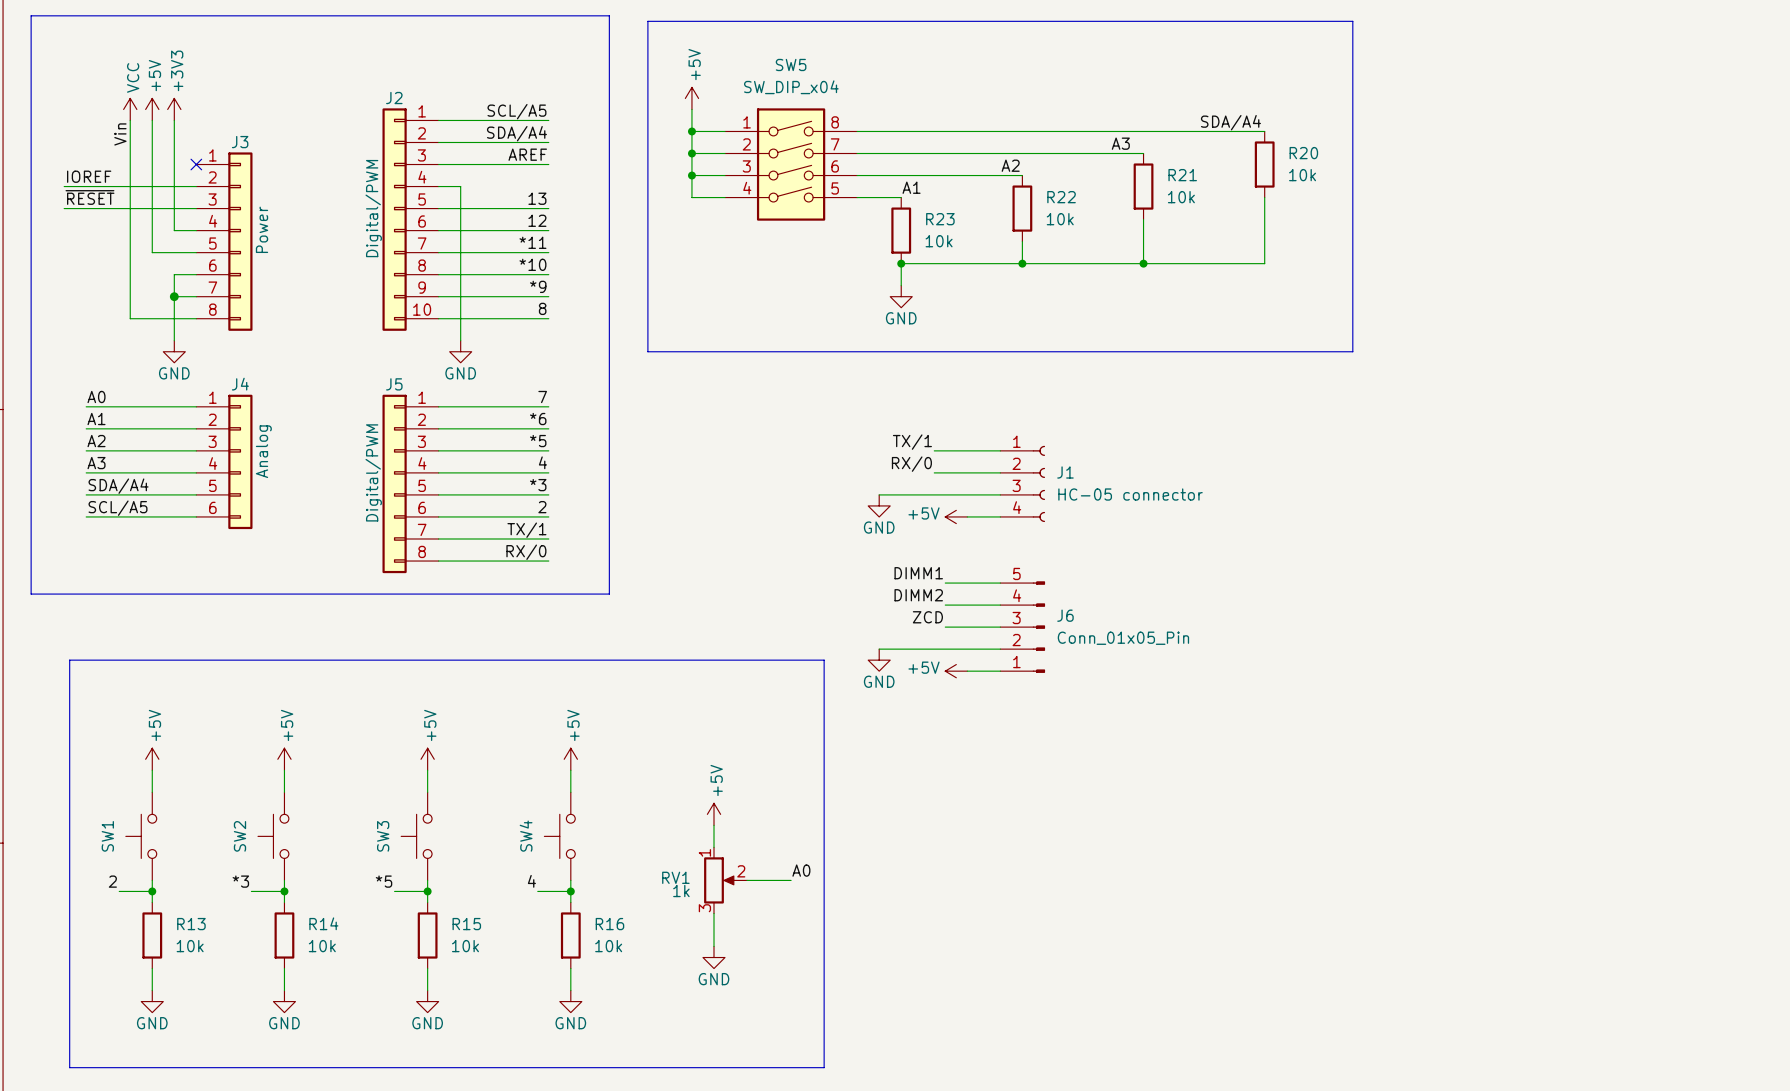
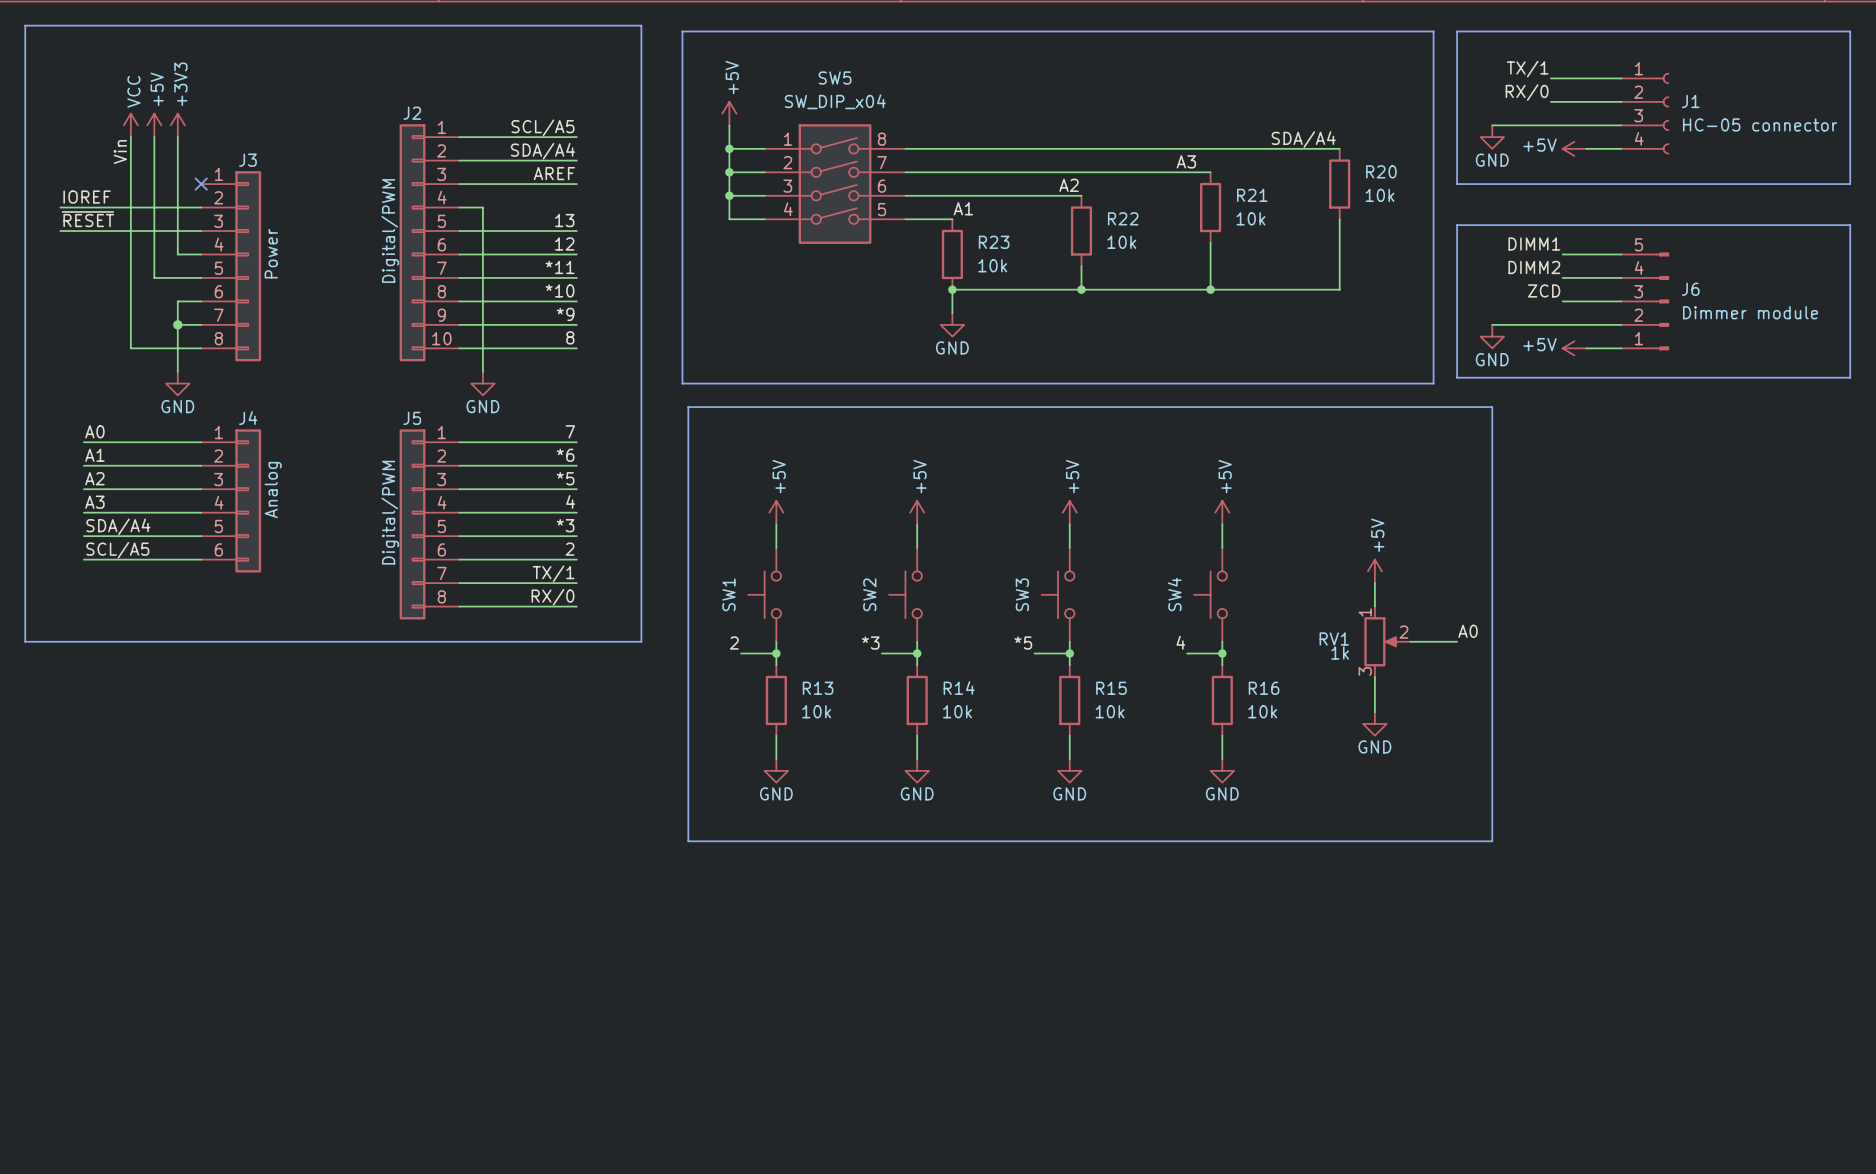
line: none -> (1457, 31) (1457, 184) (1850, 184) (1850, 31) (1457, 31)
label: none -> TX/1 (1527, 69)
wire: none -> (1550, 78) (1621, 78)
label: none -> RX/0 (1527, 92)
wire: none -> (1550, 101) (1621, 101)
wire: none -> (1492, 125) (1621, 125)
power symbol: none -> GND (1492, 137)
power symbol: none -> +5V (1574, 148)
wire: none -> (1586, 148) (1621, 148)
line: none -> (1457, 225) (1850, 225) (1850, 377) (1457, 377) (1457, 225)
label: none -> DIMM1 (1534, 244)
wire: none -> (1562, 254) (1621, 254)
label: none -> DIMM2 (1534, 267)
wire: none -> (1562, 277) (1621, 277)
label: none -> ZCD (1544, 290)
wire: none -> (1562, 301) (1621, 301)
wire: none -> (1492, 324) (1621, 324)
power symbol: none -> GND (1492, 336)
power symbol: none -> +5V (1574, 348)
wire: none -> (1586, 348) (1621, 348)
line: none -> (688, 407) (1492, 407) (1492, 841) (688, 841) (688, 407)
label: TX/1 (912, 442) -> none
wire: (934, 450) (1000, 450) -> none
label: RX/0 (911, 464) -> none
power symbol: none -> +5V (776, 512)
power symbol: none -> +5V (917, 512)
wire: (934, 472) (1000, 472) -> none
power symbol: none -> +5V (1069, 512)
power symbol: none -> +5V (1222, 512)
wire: none -> (776, 524) (776, 547)
wire: none -> (917, 524) (917, 547)
wire: none -> (1069, 524) (1069, 547)
J1 position: (1022, 483) -> (1645, 113)
wire: none -> (1222, 524) (1222, 547)
wire: (879, 494) (1000, 494) -> none
power symbol: GND (879, 505) -> none
power symbol: +5V (956, 516) -> none
wire: (967, 516) (1000, 516) -> none
power symbol: none -> +5V (1374, 571)
wire: none -> (1374, 583) (1374, 606)
label: DIMM1 (918, 573) -> none
wire: (945, 583) (1000, 583) -> none
label: none -> A0 (1468, 631)
wire: none -> (776, 641) (776, 665)
wire: none -> (917, 641) (917, 665)
wire: none -> (1069, 641) (1069, 665)
label: none -> 4 (1180, 642)
wire: none -> (1222, 641) (1222, 665)
wire: none -> (1410, 641) (1457, 641)
label: none -> 2 (734, 643)
label: none -> *3 (870, 643)
label: DIMM2 (918, 595) -> none
label: none -> *5 (1023, 643)
wire: none -> (741, 653) (776, 653)
junction: none -> (776, 653)
junction: none -> (917, 653)
wire: (945, 605) (978, 605) -> (881, 653) (917, 653)
junction: none -> (1069, 653)
junction: none -> (1222, 653)
label: ZCD (927, 617) -> none
wire: (945, 627) (1000, 627) -> none
J6 position: (1022, 627) -> (1645, 301)
wire: none -> (1374, 676) (1374, 712)
J6 value: Conn_01x05_Pin (1123, 638) -> Dimmer module (1750, 312)
wire: (879, 649) (1000, 649) -> none
line: (69, 660) (824, 660) (824, 1067) (69, 1067) (69, 660) -> none
power symbol position: GND (879, 660) -> GND (917, 770)
power symbol: +5V (956, 671) -> none
wire: (967, 671) (1000, 671) -> (1187, 653) (1222, 653)
power symbol: none -> GND (1374, 723)
wire: none -> (917, 735) (917, 759)
wire: none -> (1069, 735) (1069, 759)
wire: none -> (1222, 735) (1222, 759)
power symbol: none -> GND (776, 770)
power symbol: none -> GND (1069, 770)
power symbol: none -> GND (1222, 770)
power symbol: +5V (152, 759) -> none
power symbol: +5V (284, 759) -> none
power symbol: +5V (427, 759) -> none
power symbol: +5V (570, 759) -> none
wire: (152, 770) (152, 792) -> none
wire: (284, 770) (284, 792) -> none
wire: (427, 770) (427, 792) -> none
wire: (570, 770) (570, 792) -> none
power symbol: +5V (713, 814) -> none
wire: (713, 825) (713, 847) -> (776, 735) (776, 759)
SW1 position: (141, 836) -> (764, 594)
SW2 position: (273, 836) -> (905, 594)
SW3 position: (416, 836) -> (1058, 594)
SW4 position: (559, 836) -> (1210, 594)
label: A0 (801, 870) -> none
wire: (152, 880) (152, 902) -> none
wire: (284, 880) (284, 902) -> none
wire: (427, 880) (427, 902) -> none
wire: (570, 880) (570, 902) -> none
RV1 position: (725, 880) -> (1387, 641)
wire: (747, 880) (791, 880) -> none
label: 2 (112, 881) -> none
label: *3 (240, 881) -> none
label: *5 (384, 881) -> none
label: 4 (531, 881) -> none
wire: (119, 891) (152, 891) -> none
junction: (152, 891) -> none
wire: (251, 891) (284, 891) -> none
junction: (284, 891) -> none
wire: (394, 891) (427, 891) -> none
junction: (427, 891) -> none
wire: (537, 891) (570, 891) -> none
junction: (570, 891) -> none
wire: (713, 913) (713, 946) -> none
R13 position: (152, 935) -> (776, 700)
R14 position: (284, 935) -> (917, 700)
R15 position: (427, 935) -> (1069, 700)
R16 position: (570, 935) -> (1222, 700)
power symbol: GND (713, 957) -> none
wire: (152, 968) (152, 990) -> none
wire: (284, 968) (284, 990) -> none
wire: (427, 968) (427, 990) -> none
wire: (570, 968) (570, 990) -> none
power symbol: GND (152, 1001) -> none
power symbol: GND (284, 1001) -> none
power symbol: GND (427, 1001) -> none
power symbol: GND (570, 1001) -> none

